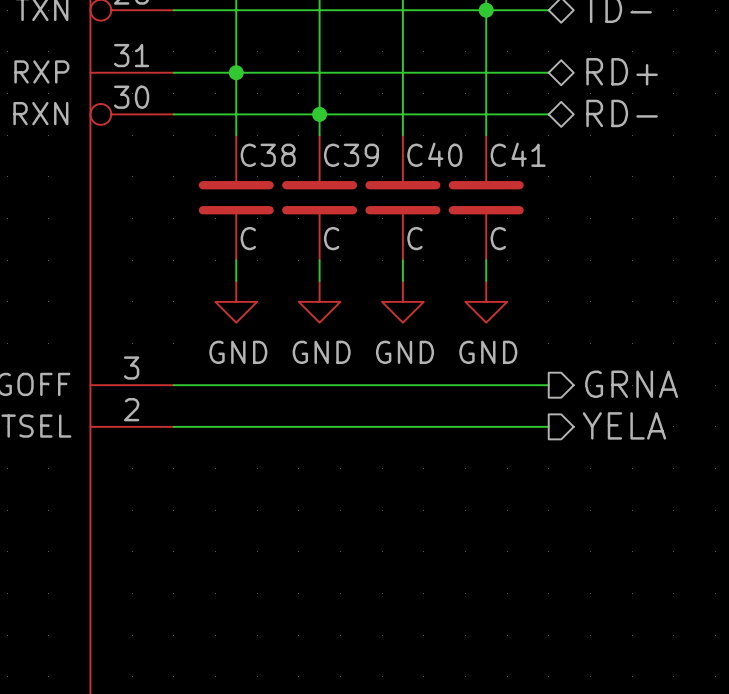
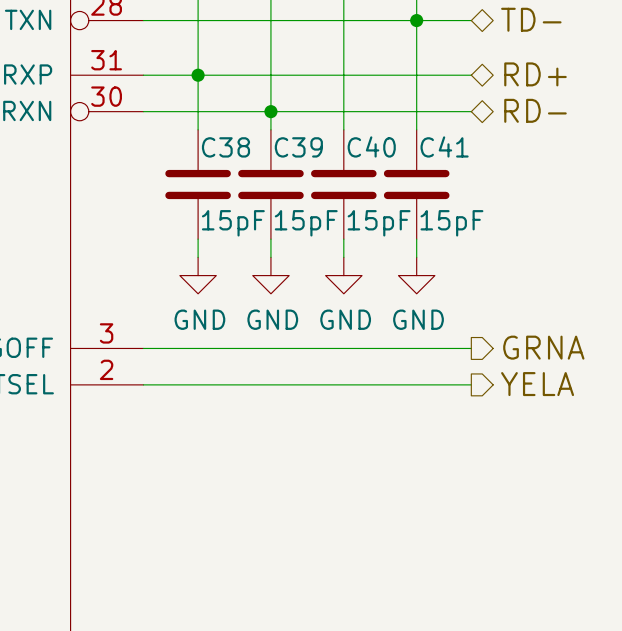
C38 value: C (248, 238) -> 15pF (233, 223)
C39 value: C (331, 238) -> 15pF (306, 223)
C40 value: C (414, 238) -> 15pF (379, 223)
C41 value: C (498, 238) -> 15pF (451, 223)

